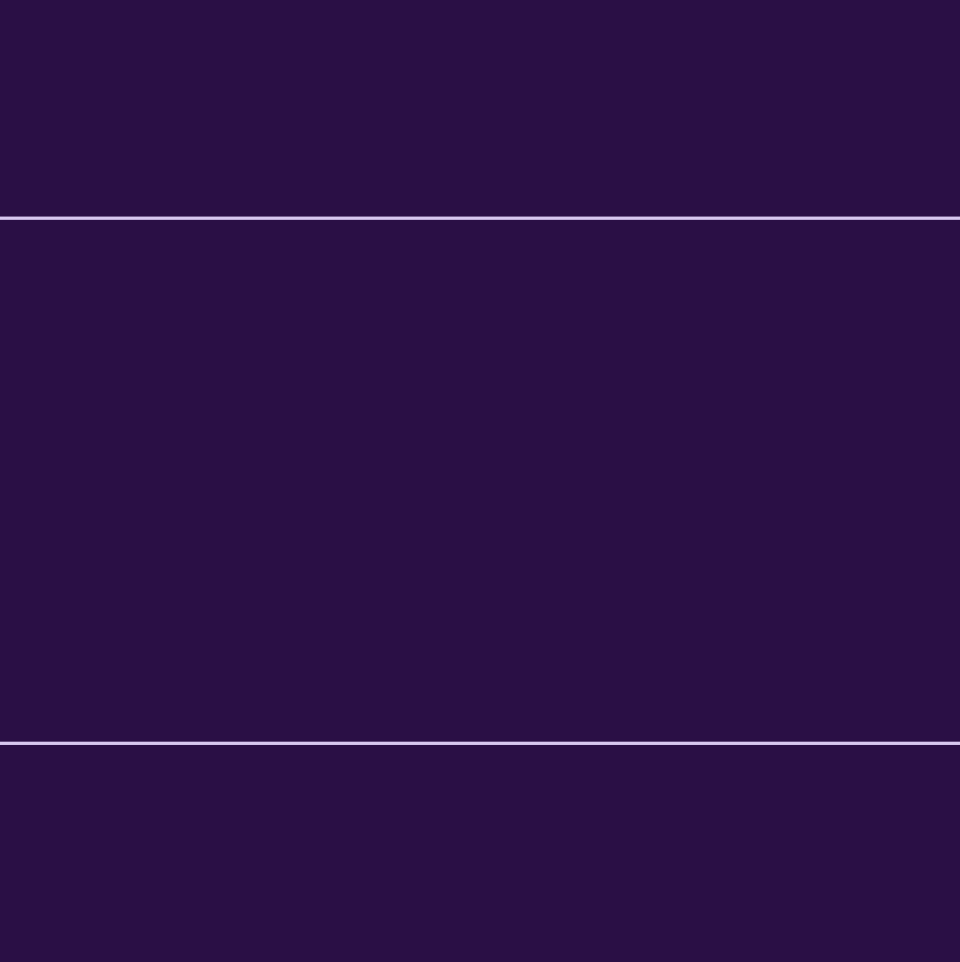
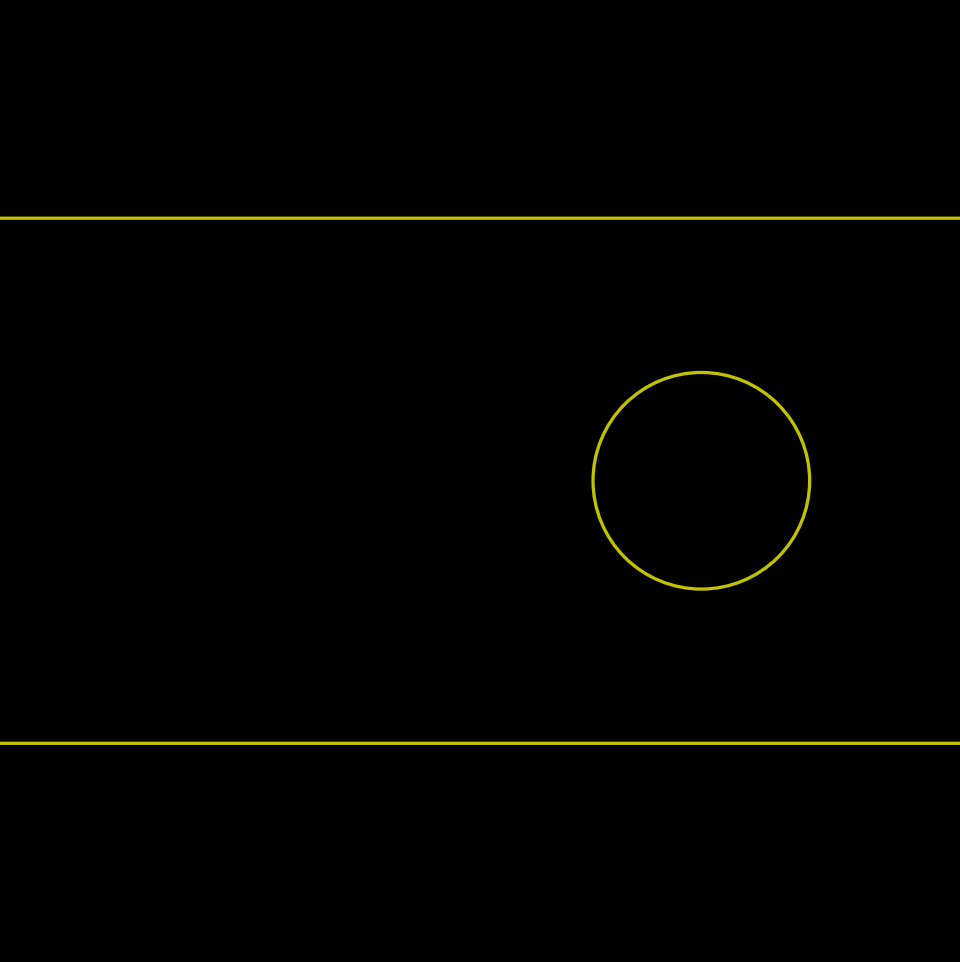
round board edge: none -> [591, 370, 812, 591]

